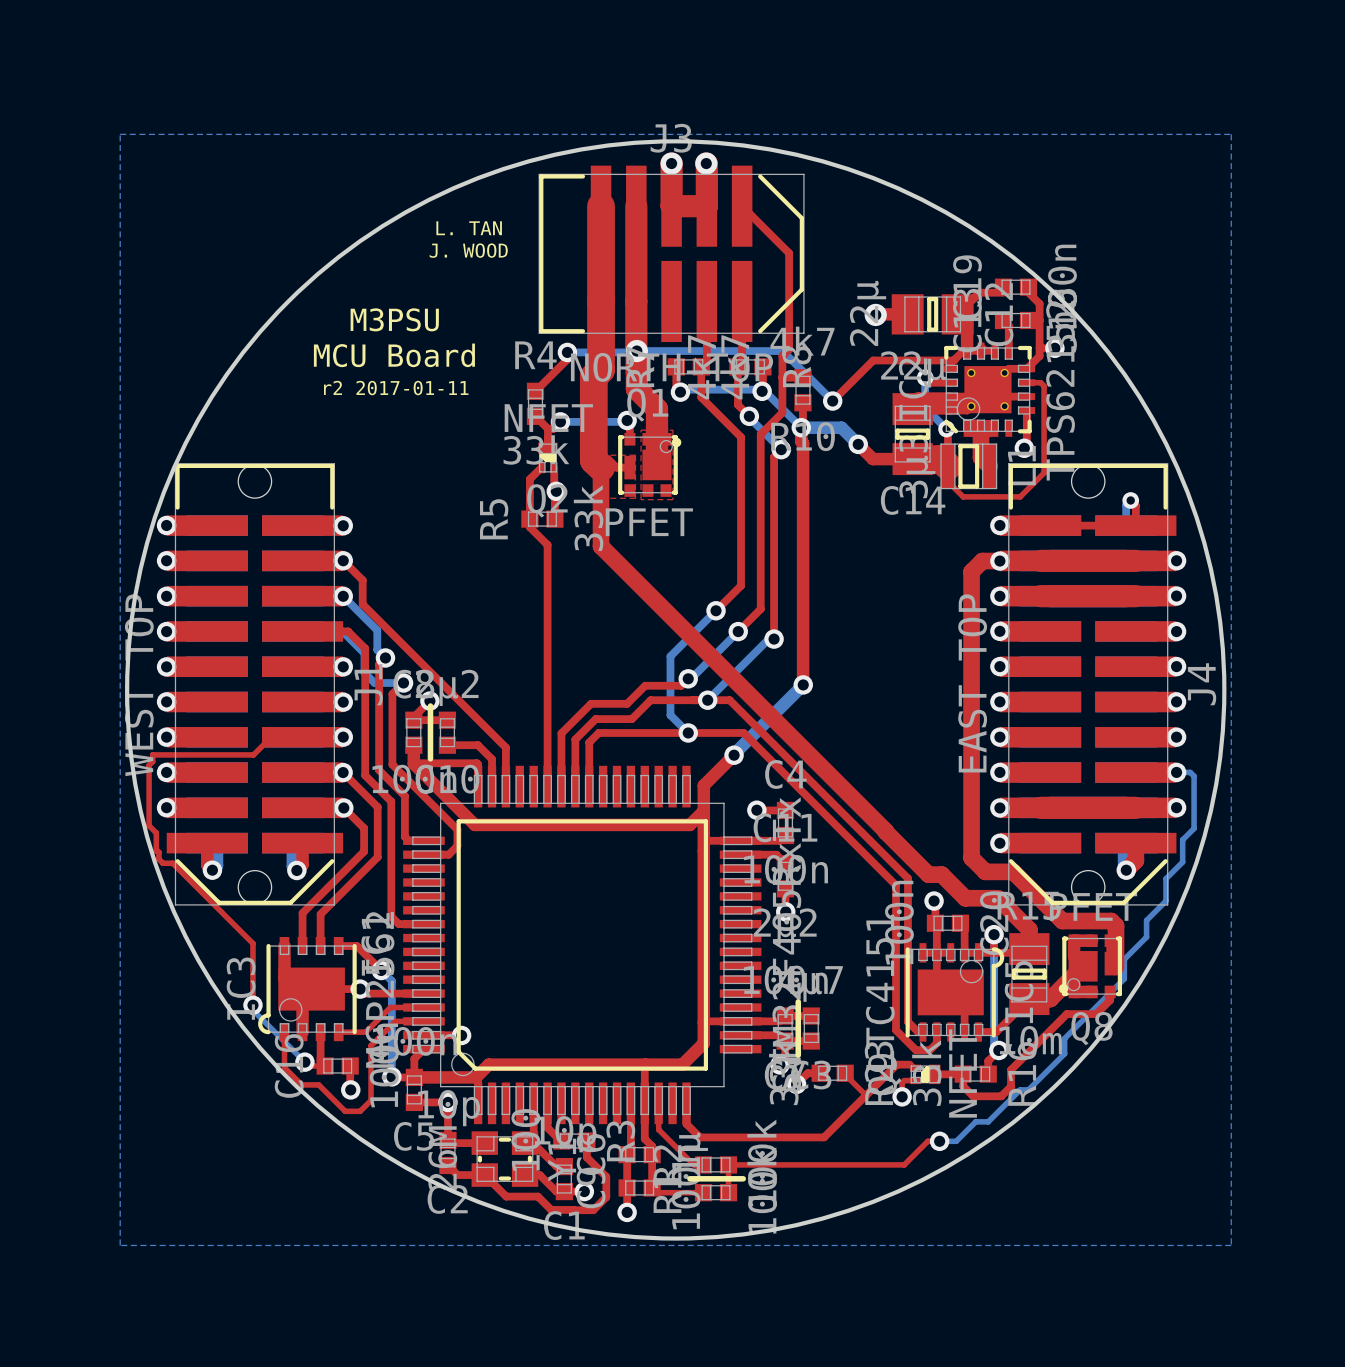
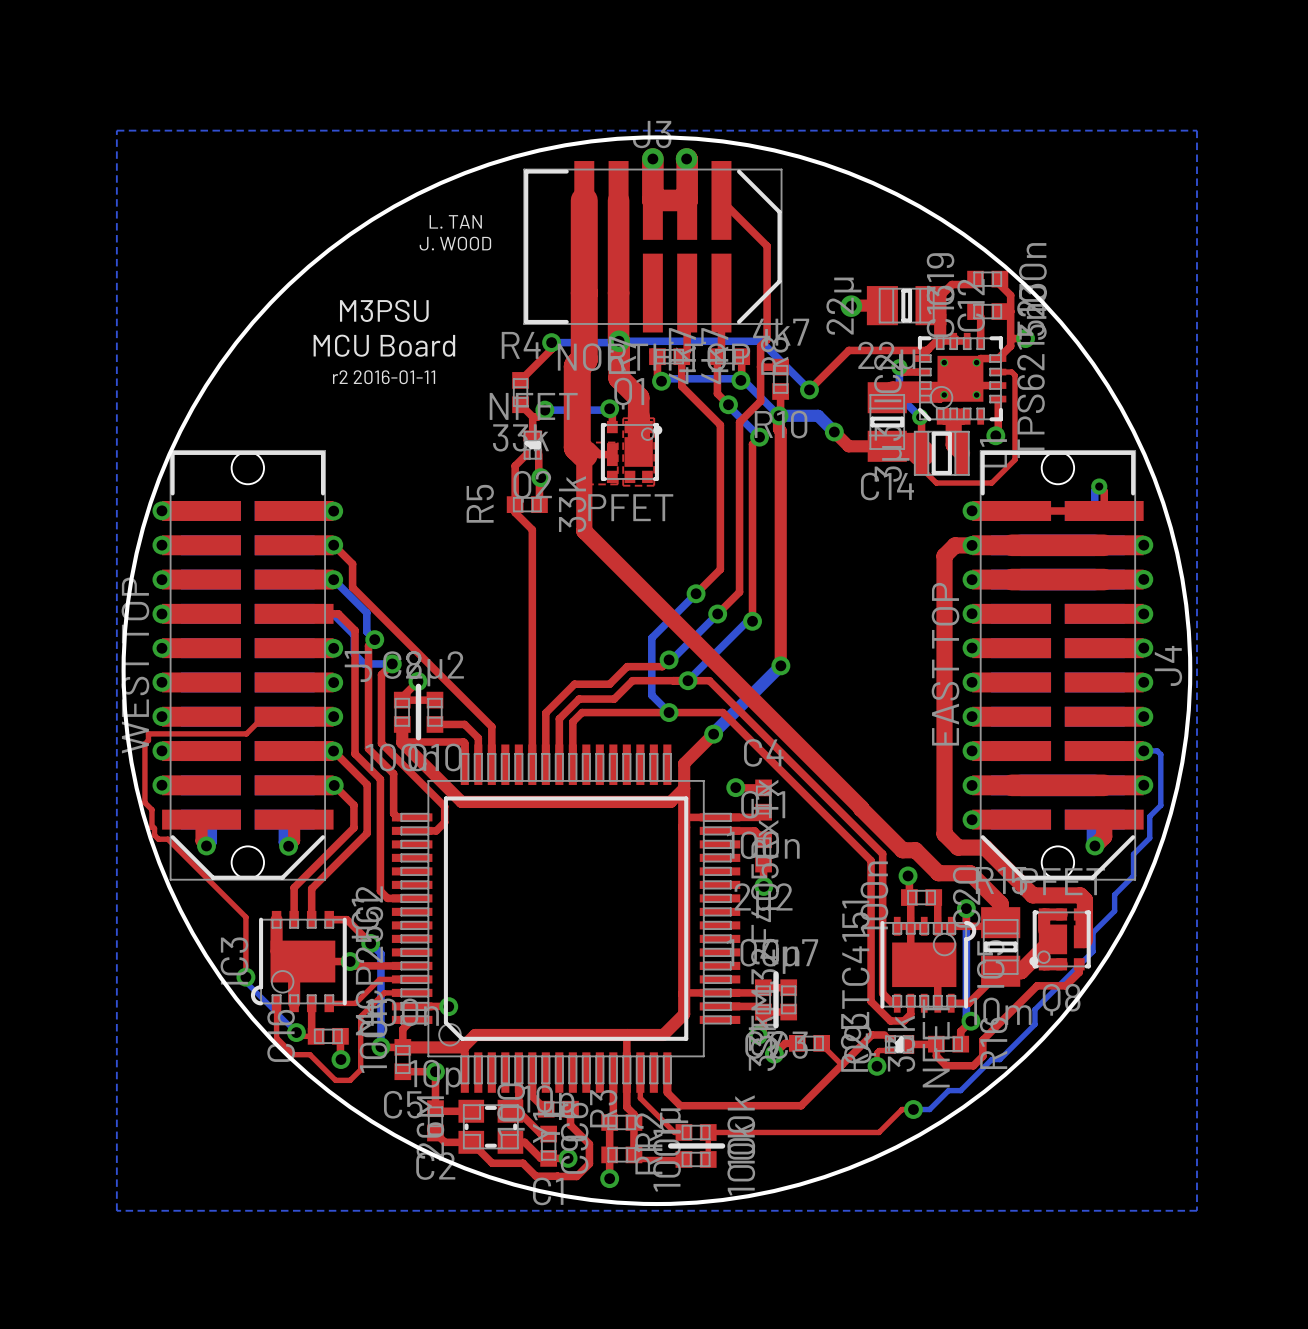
text: r2 2017-01-11 (396, 388) -> r2 2016-01-11 (384, 377)

